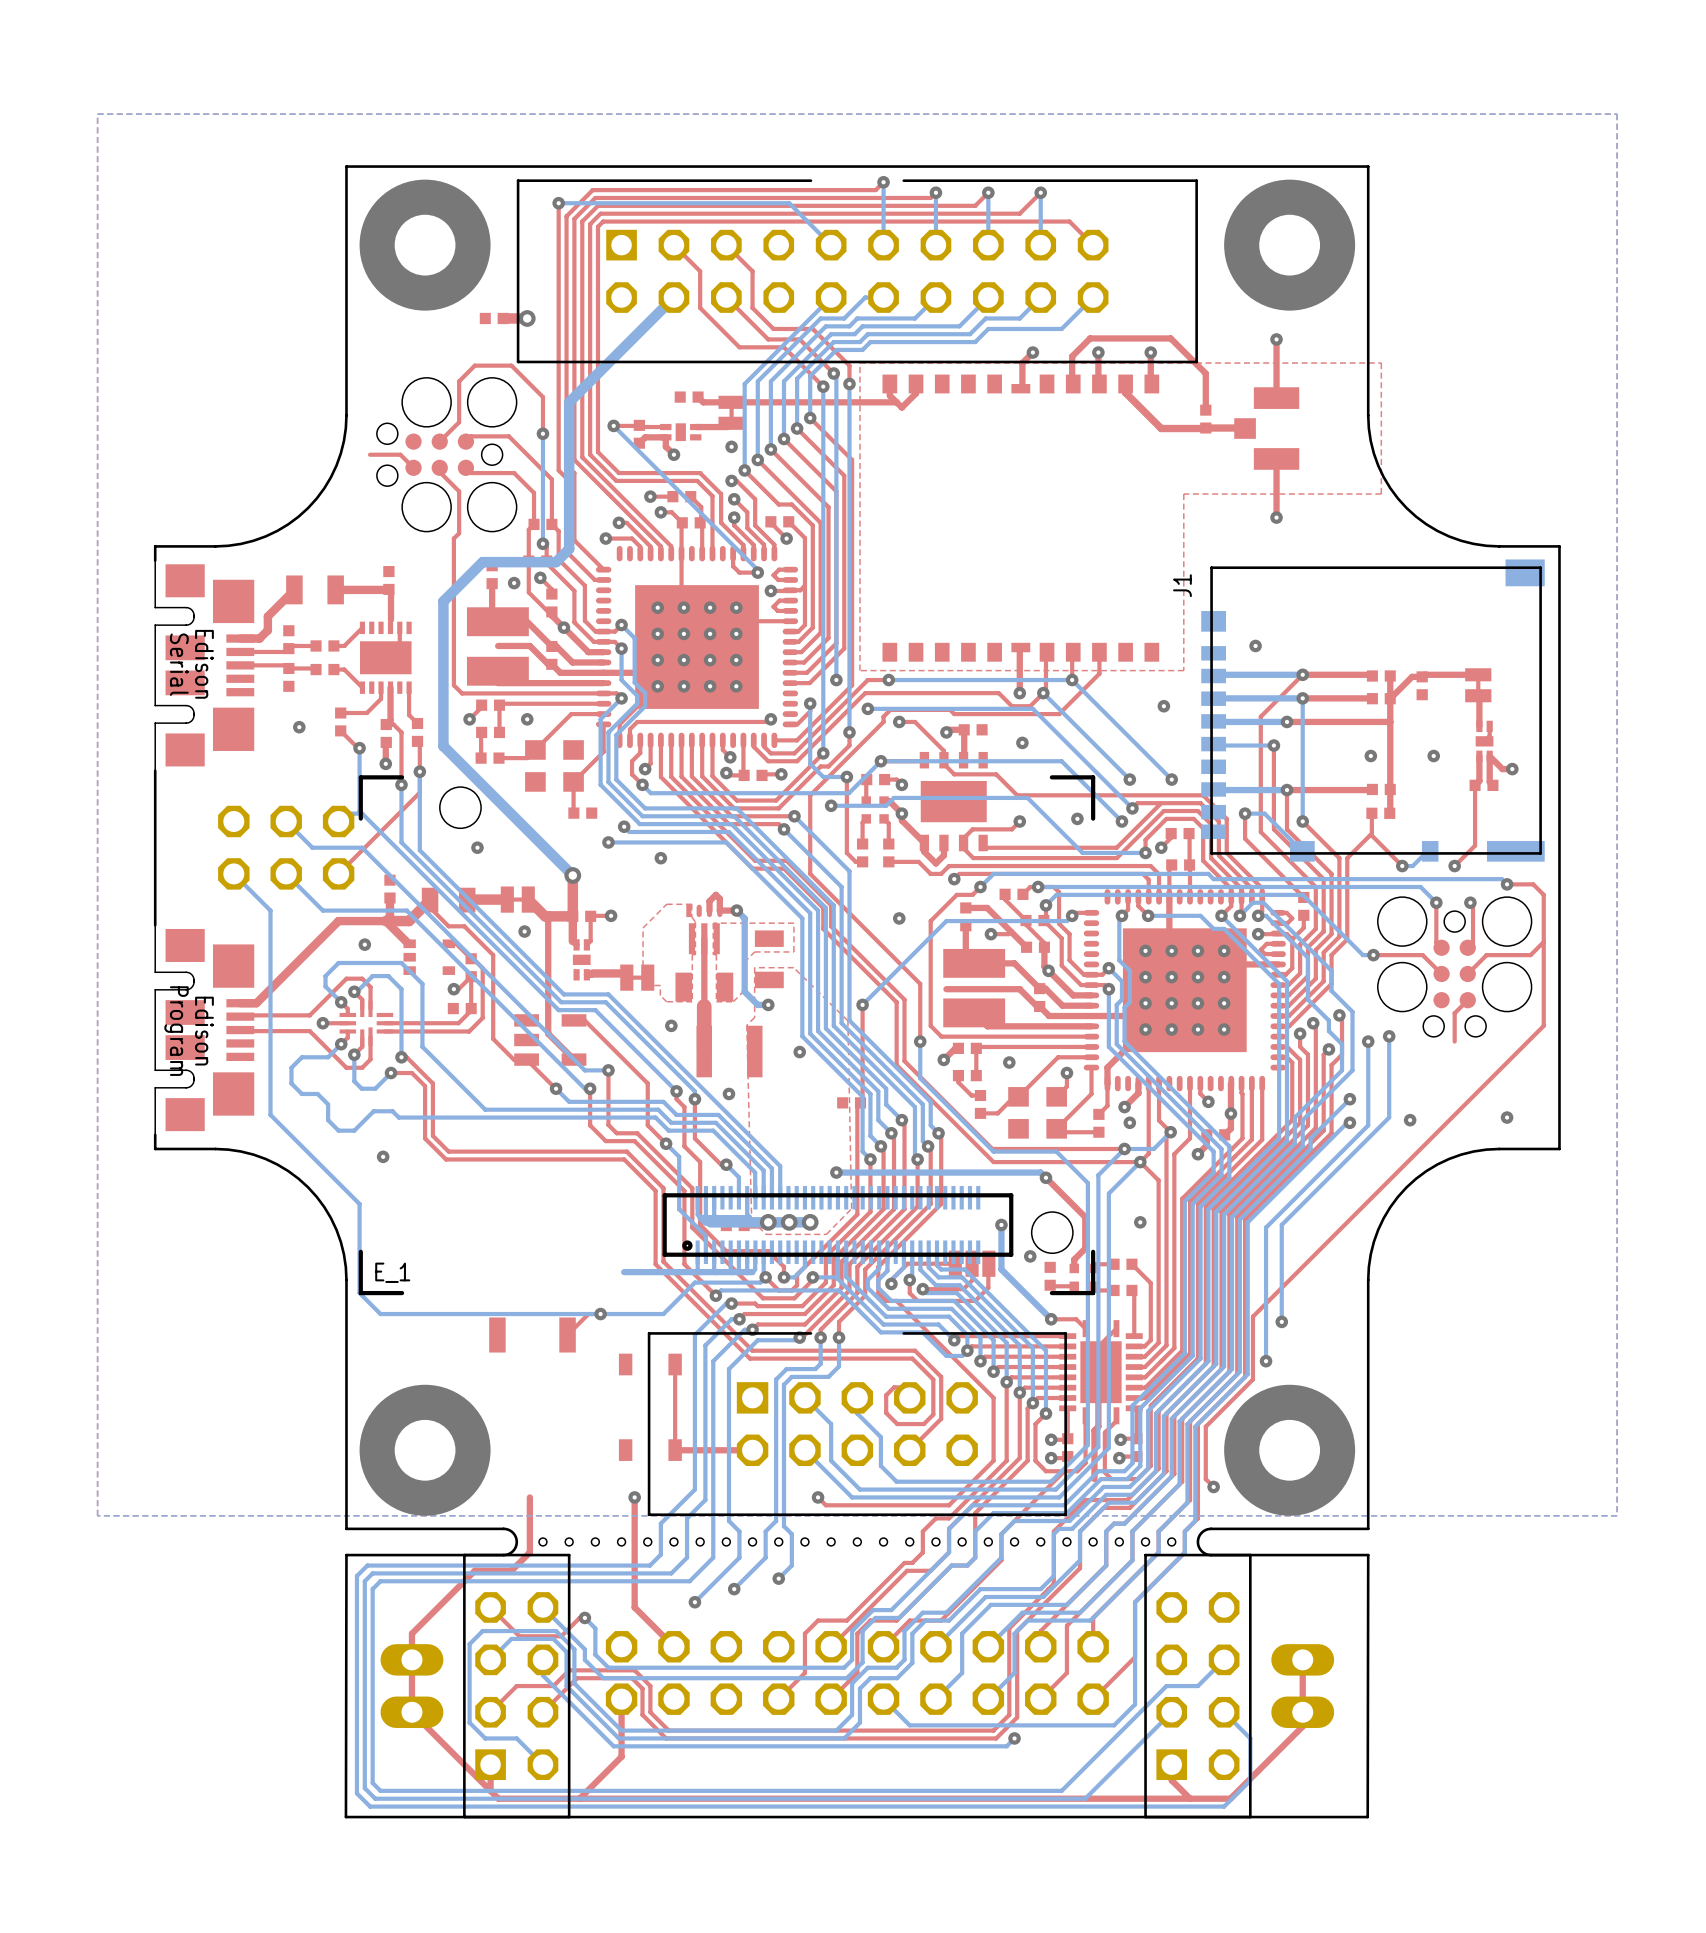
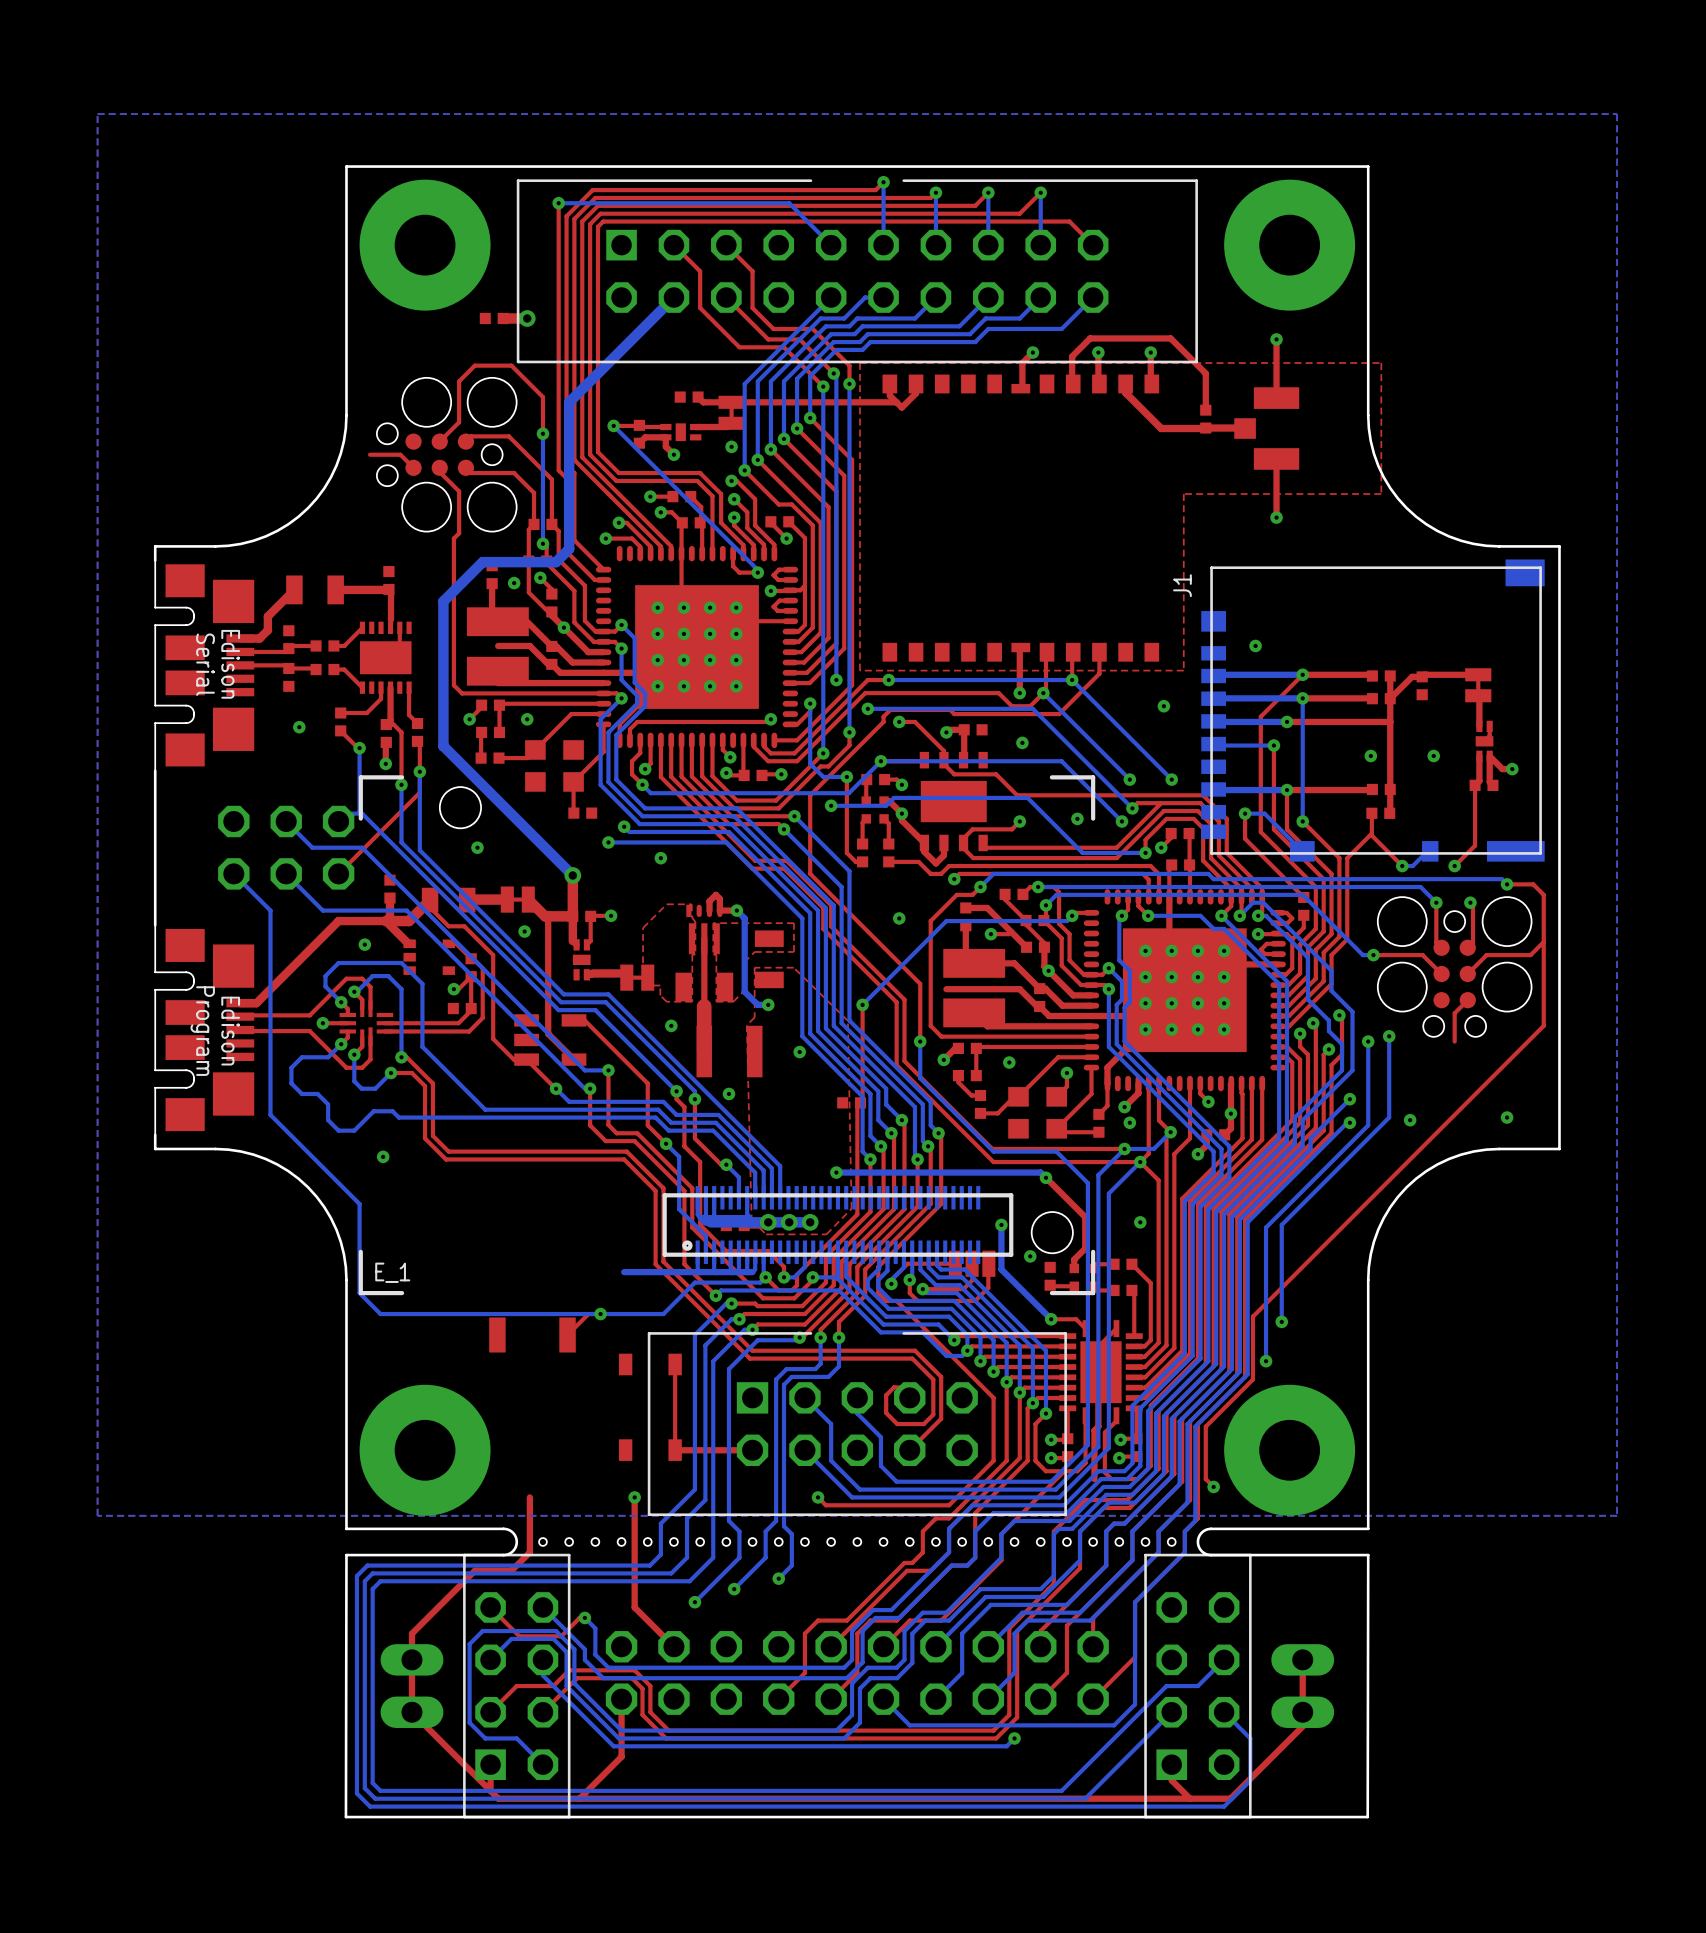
text: Serial (179, 664) -> none
text: Edison (204, 664) -> Serial (205, 664)
text: none -> Edison (230, 664)
text: Program (176, 1031) -> none
text: Edison (204, 1031) -> Program (202, 1031)
text: none -> Edison (230, 1031)

